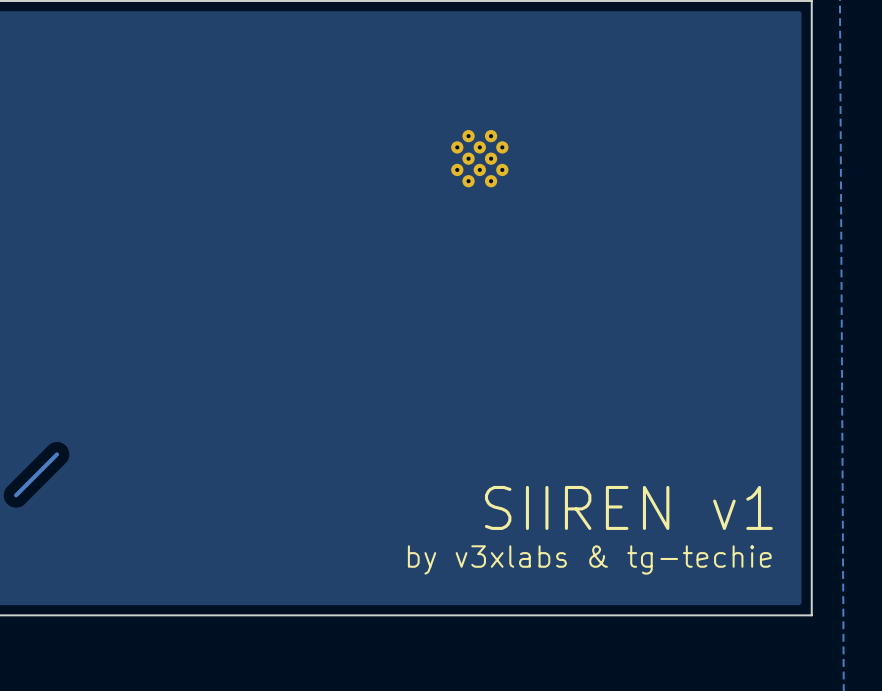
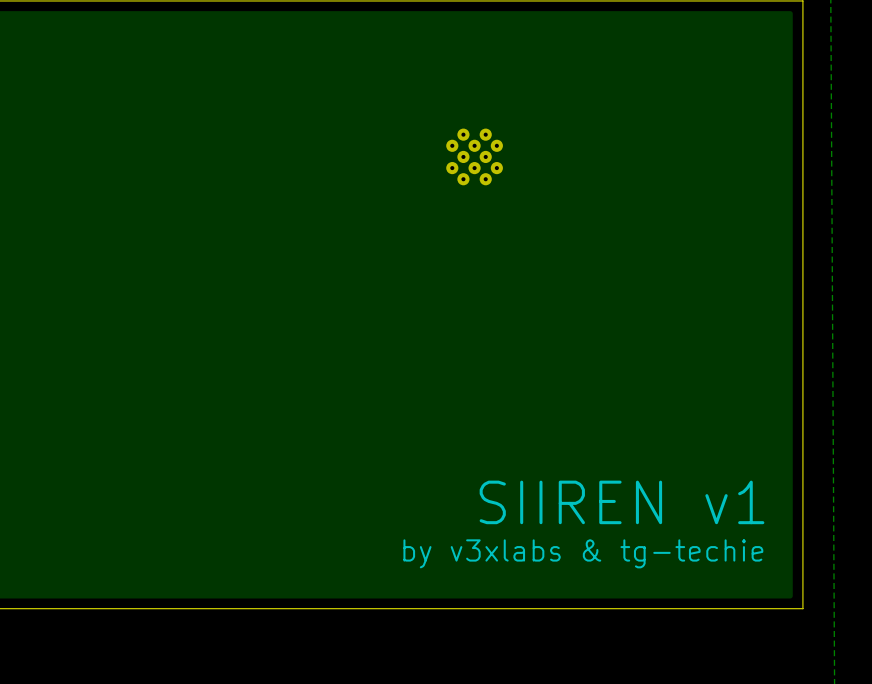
track: (57, 454) (16, 495) -> none

